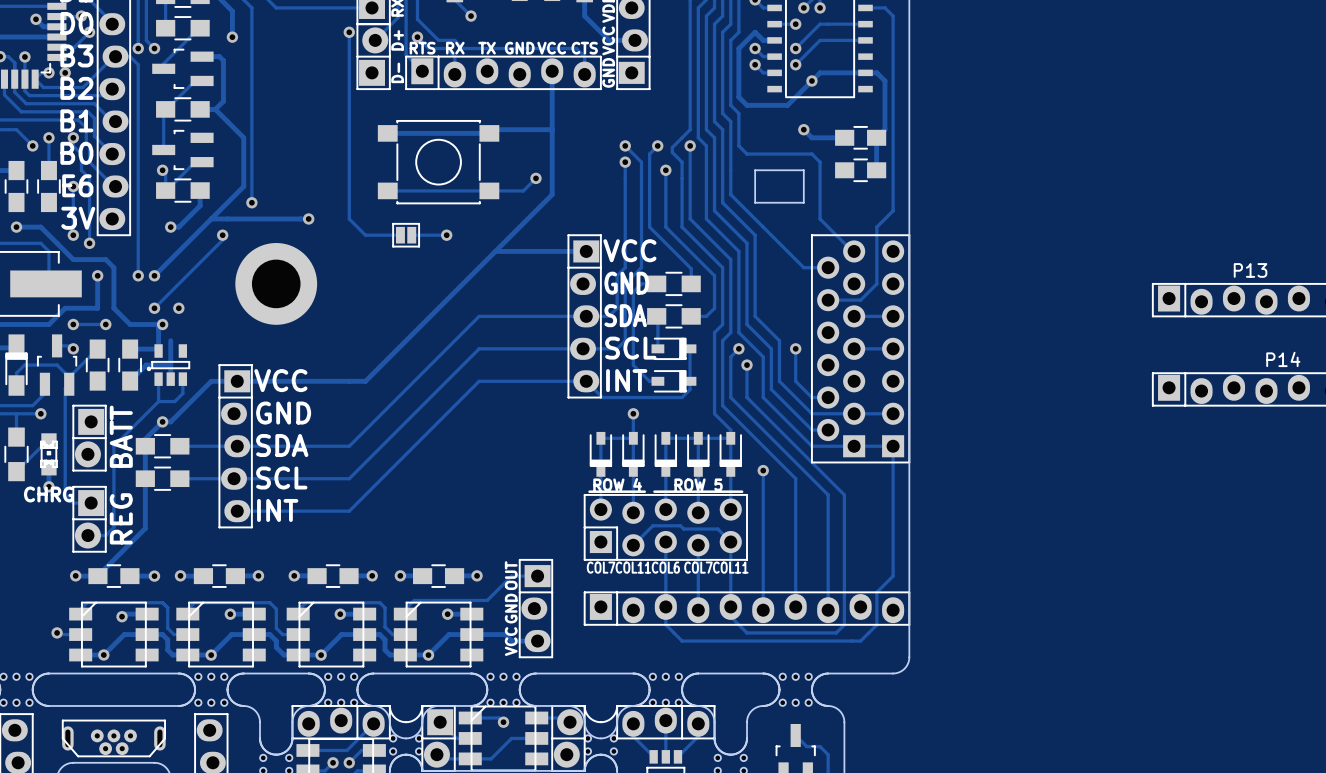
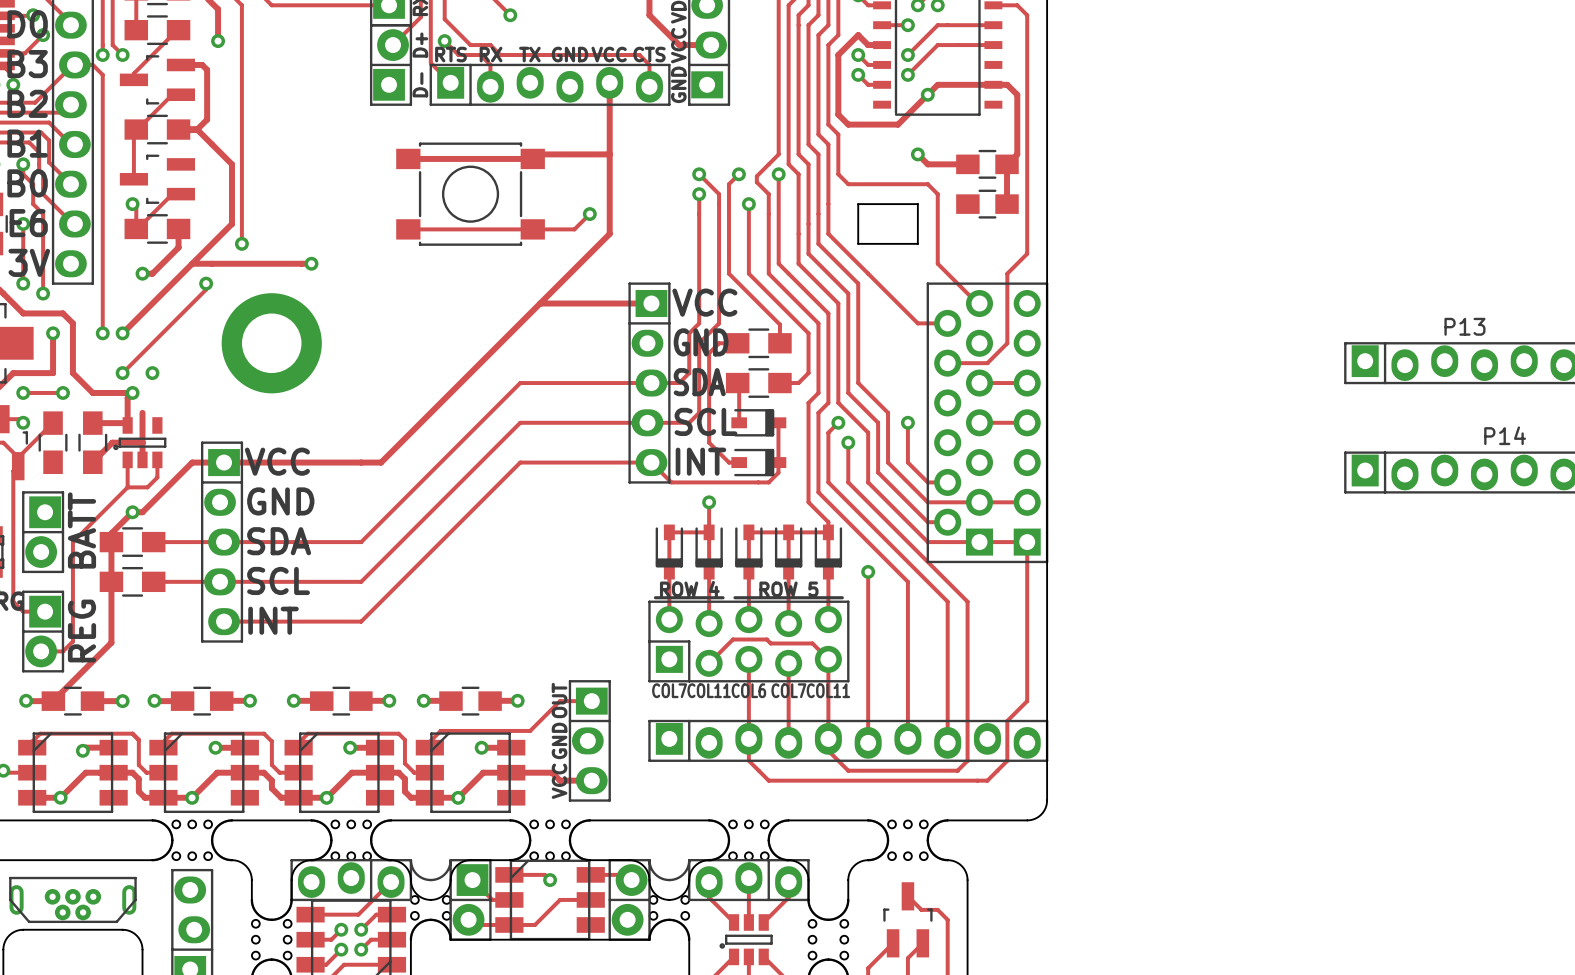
track: (349, 32) (349, 218) (365, 235) (400, 235) -> none
via: (349, 32) -> none
part: (406, 235) -> none
track: (411, 235) (446, 235) -> none
via: (446, 235) -> none

